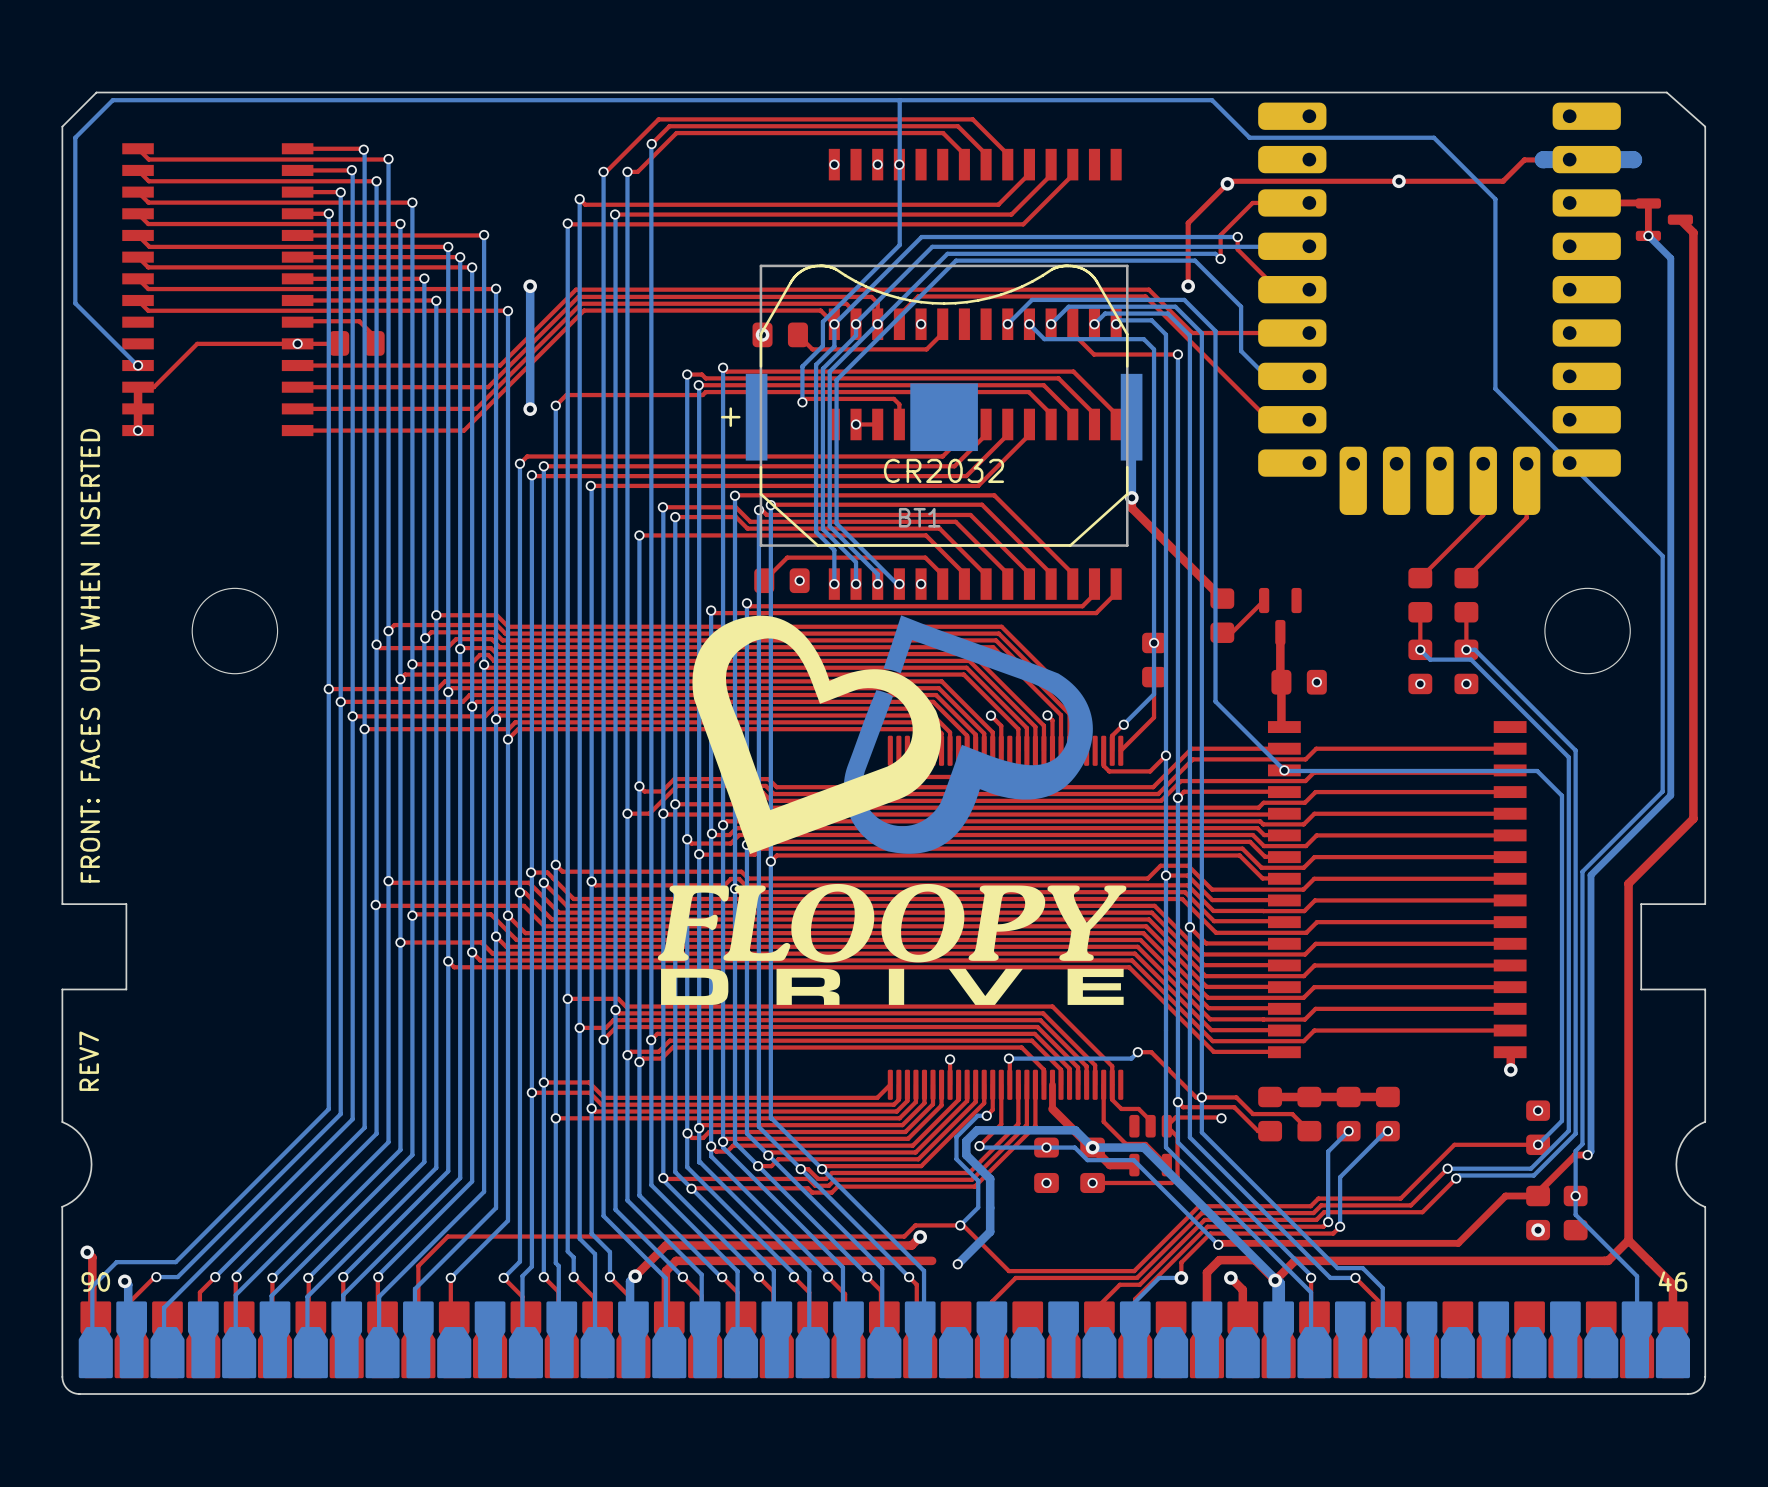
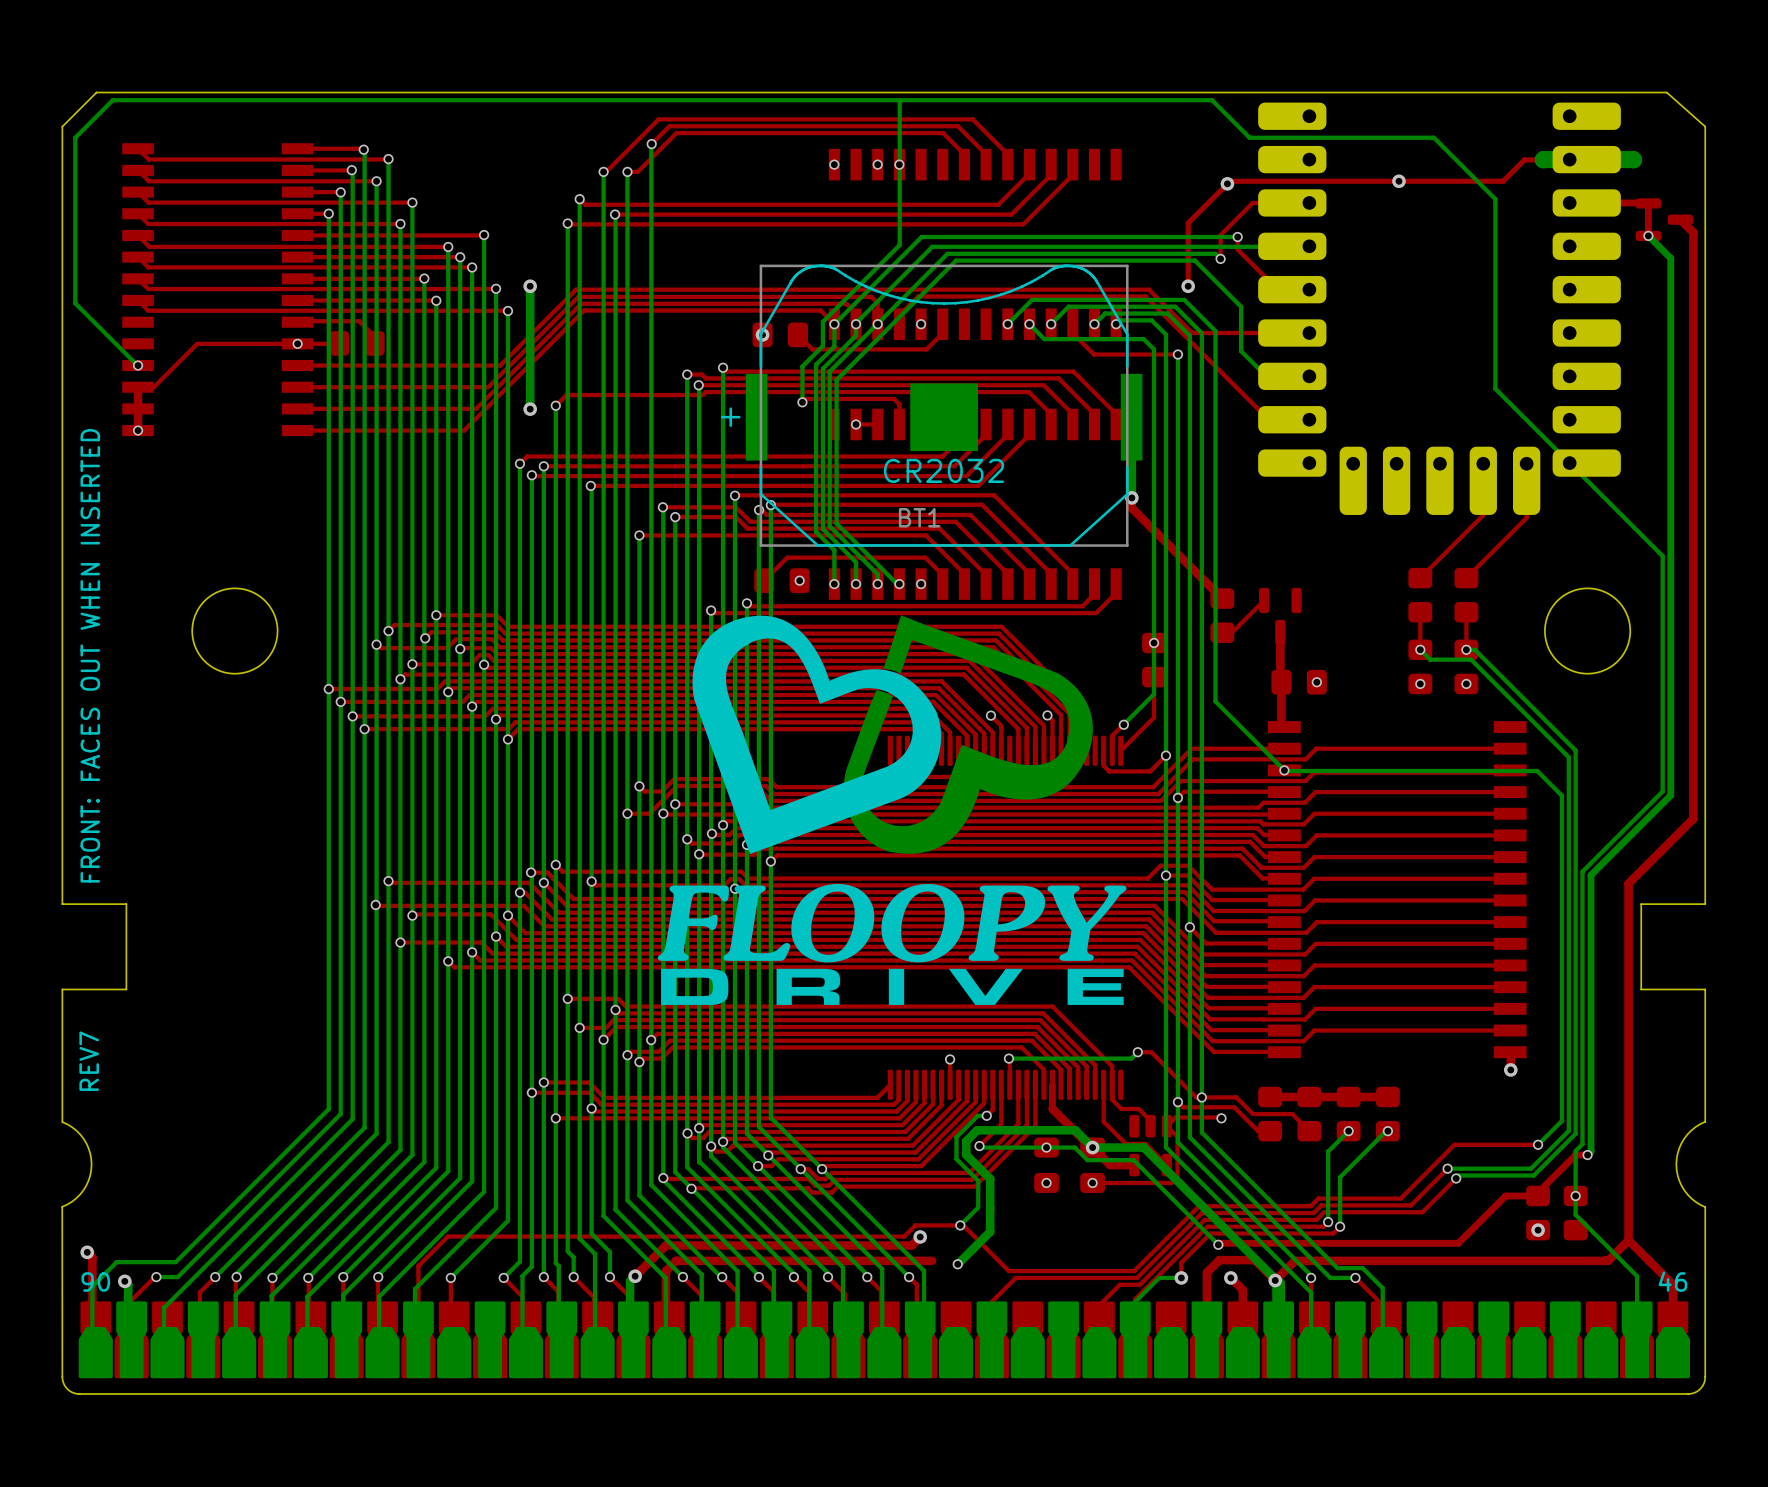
via: (1538, 1110) -> none
part: (1538, 1127) -> none

